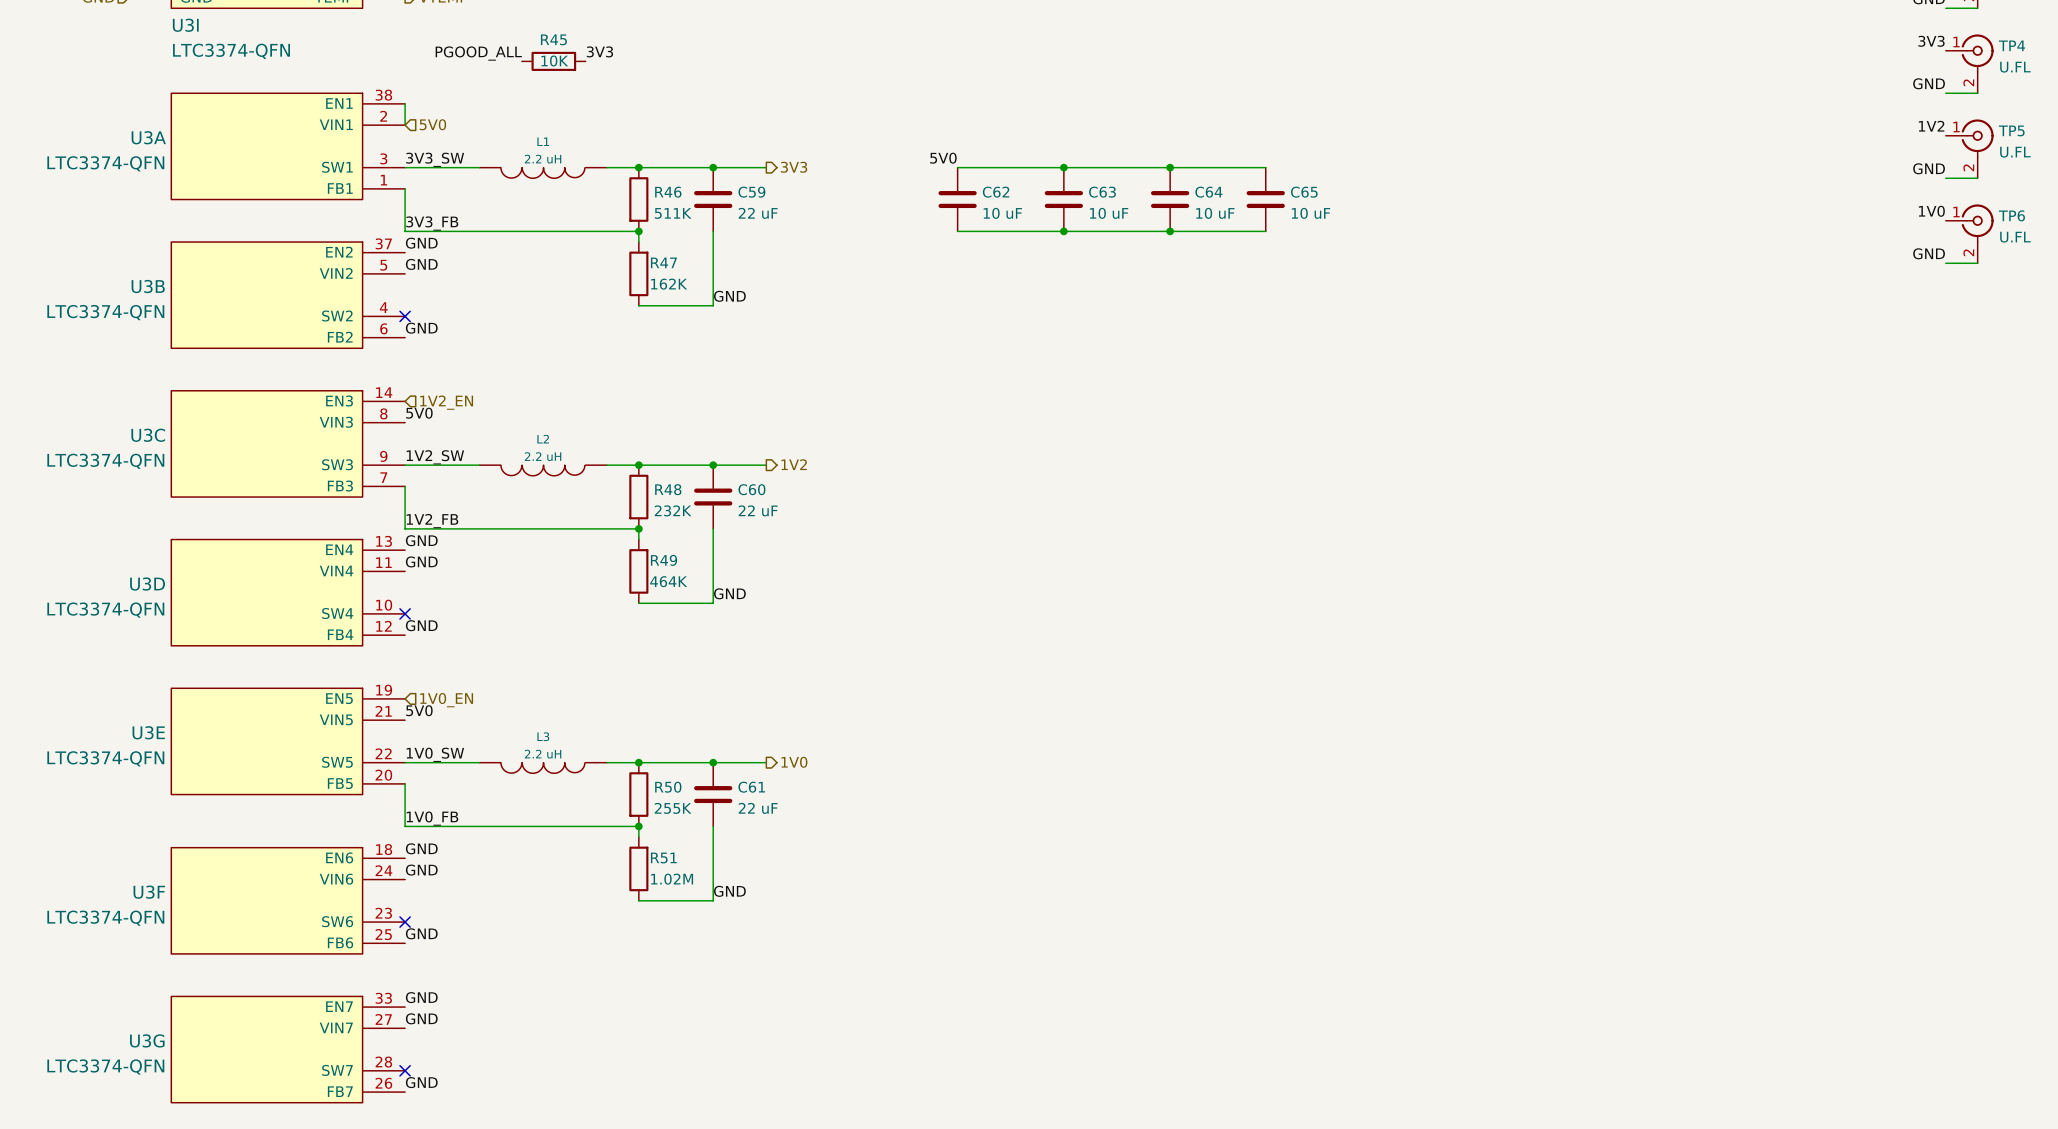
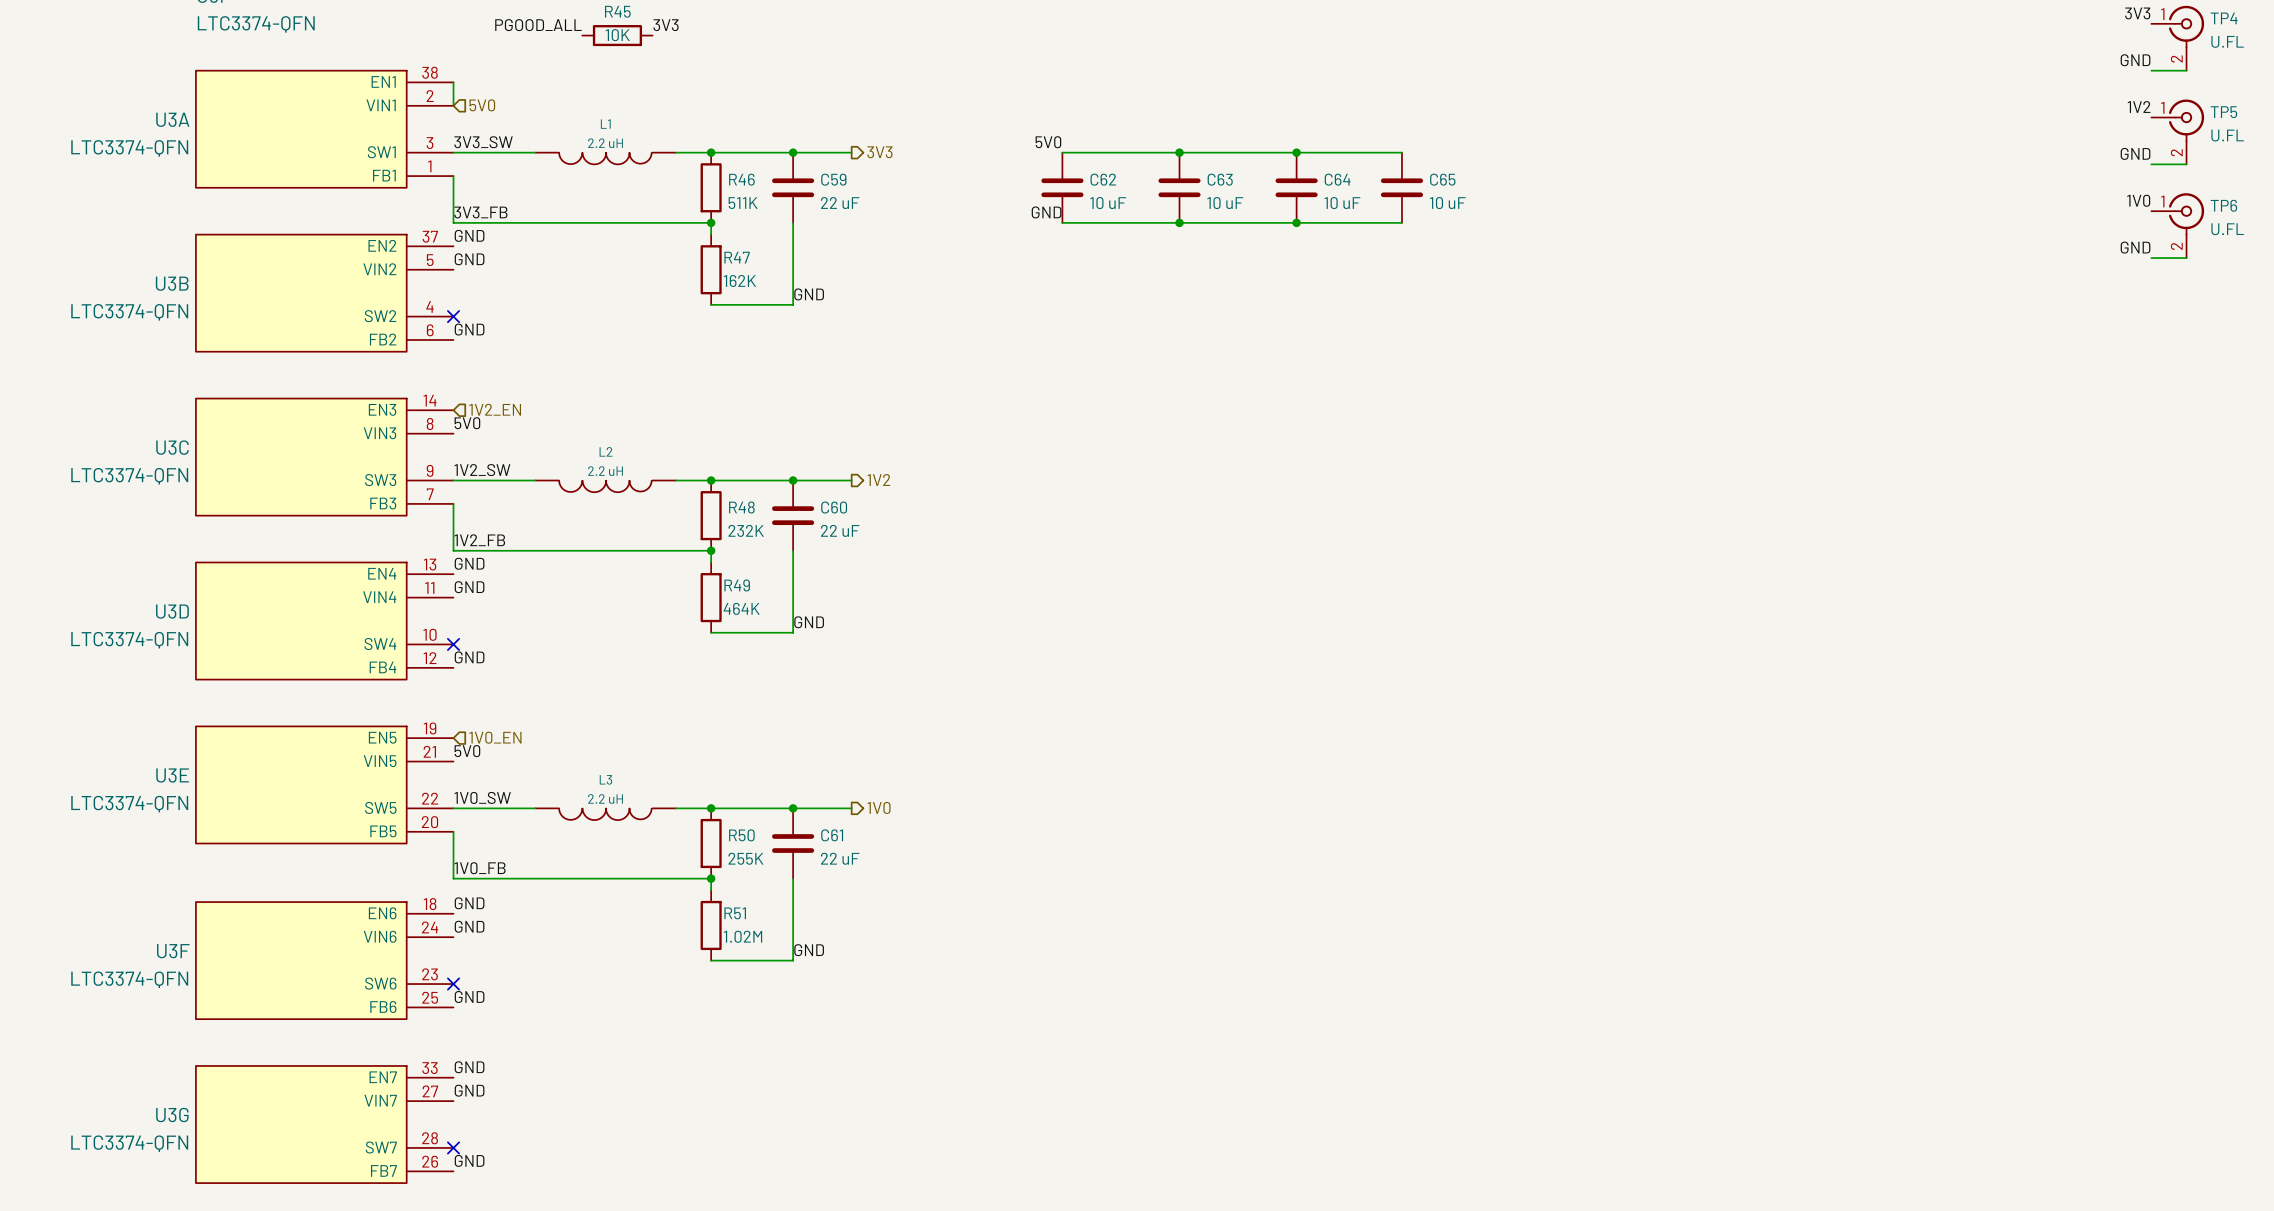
label: none -> GND (1046, 212)

